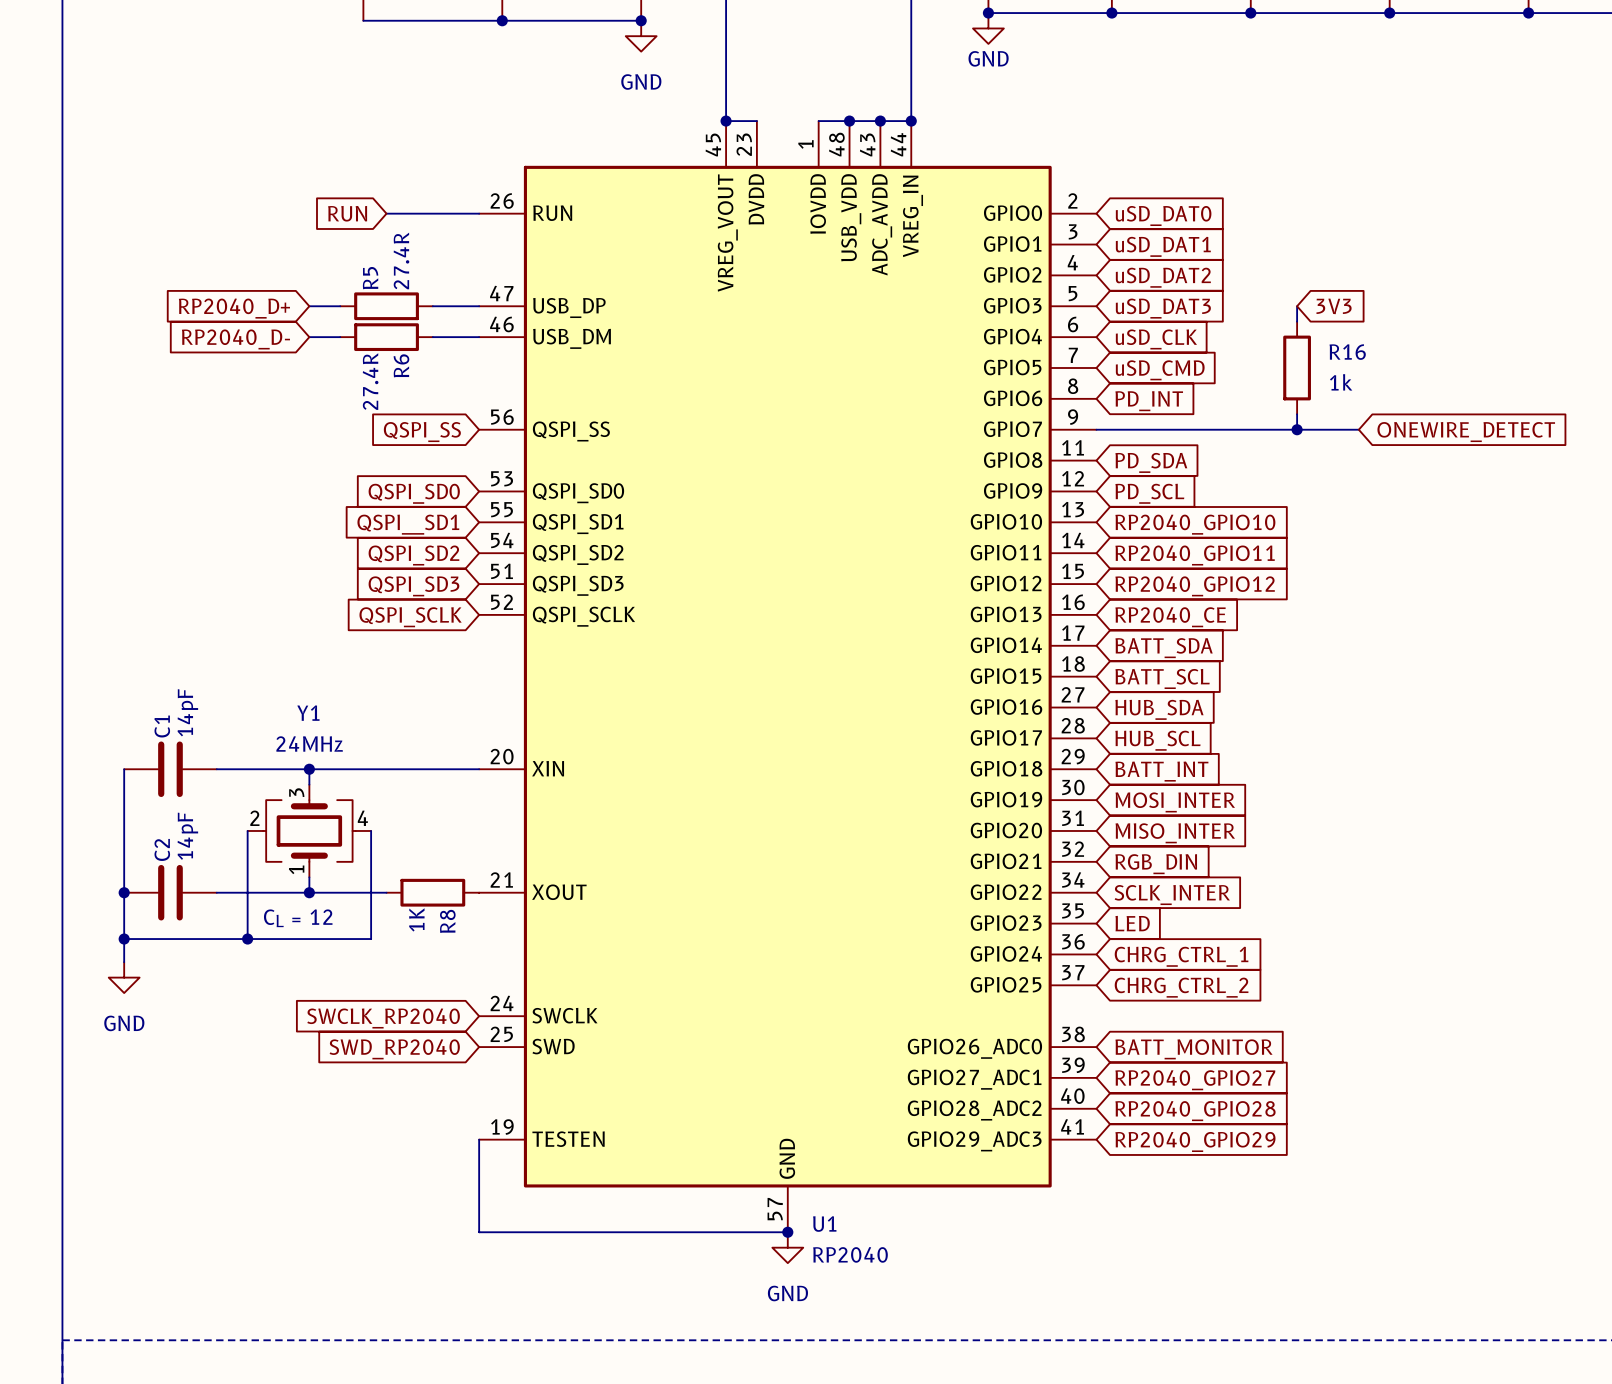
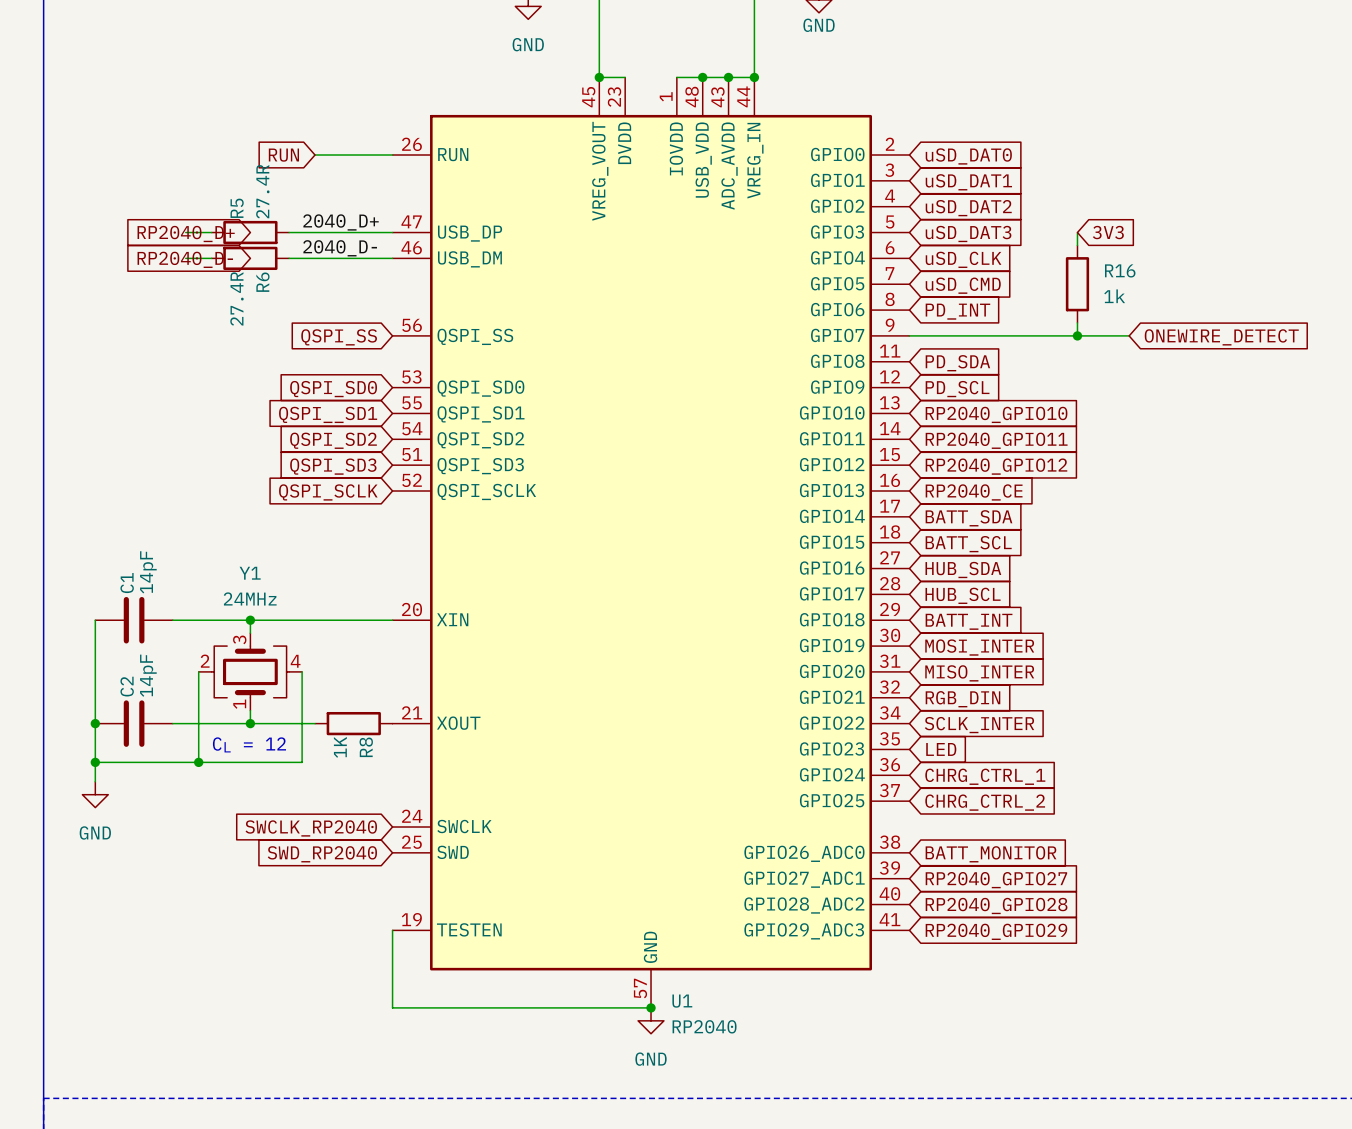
label: none -> 2040_D+ (341, 222)
wire: (309, 306) (340, 306) -> (185, 232) (211, 232)
wire: none -> (289, 232) (353, 232)
R5 position: (386, 306) -> (250, 232)
label: none -> 2040_D- (340, 248)
wire: (309, 337) (340, 337) -> (185, 258) (211, 258)
wire: none -> (289, 258) (353, 258)
R6 position: (386, 337) -> (250, 258)

